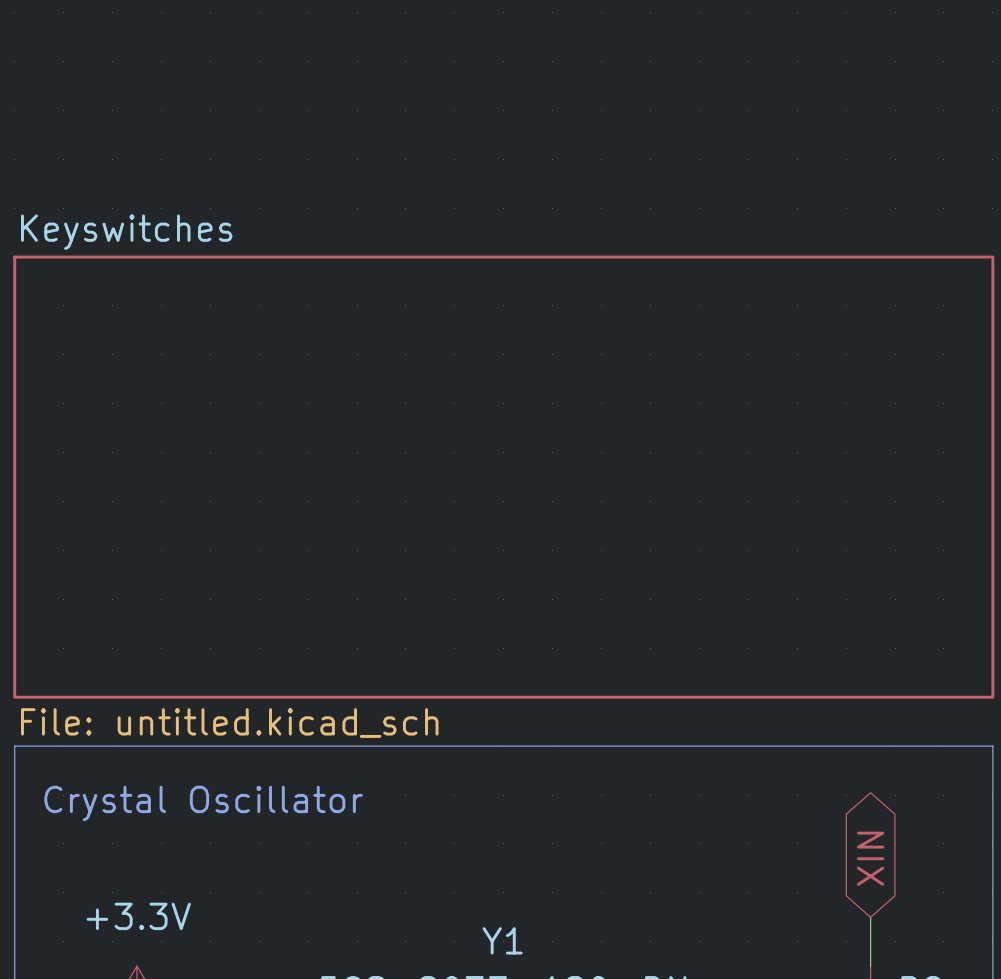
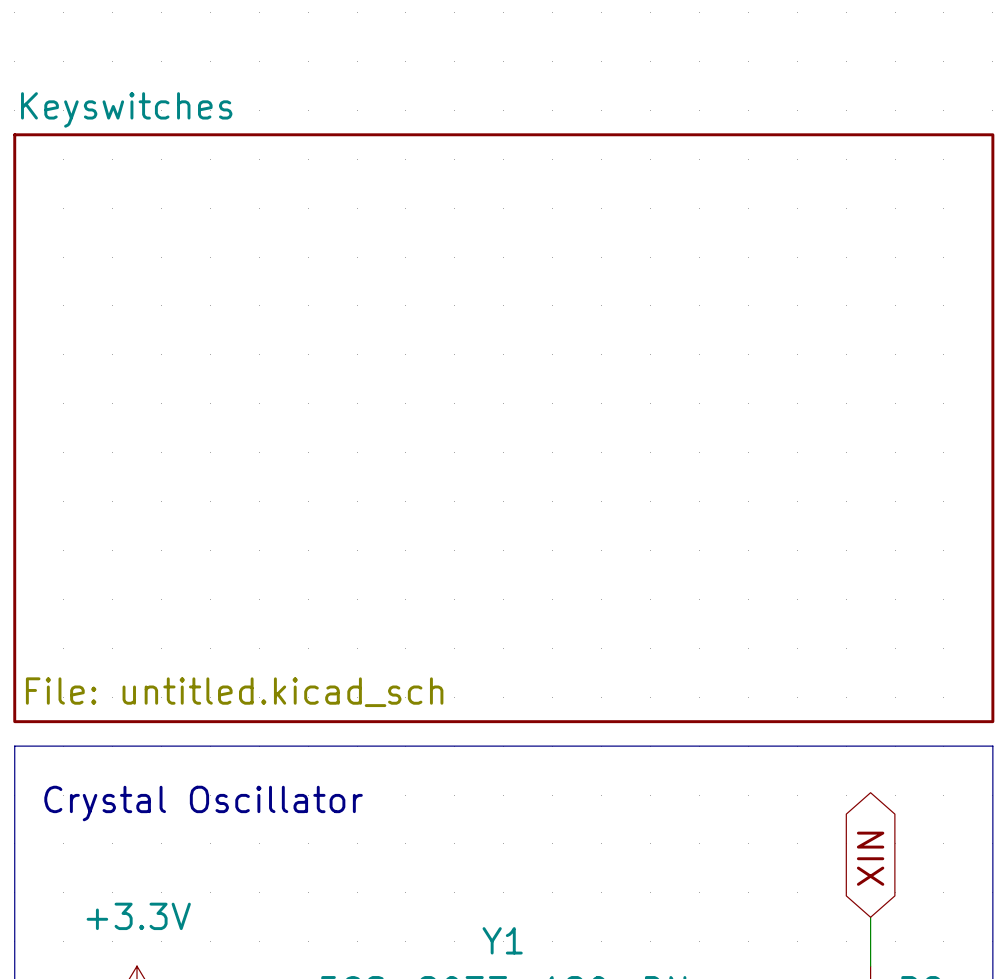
sheet Keyswitches: none -> File: untitled.kicad_sch (503, 428)
sheet Keyswitches: File: untitled.kicad_sch (503, 477) -> none

